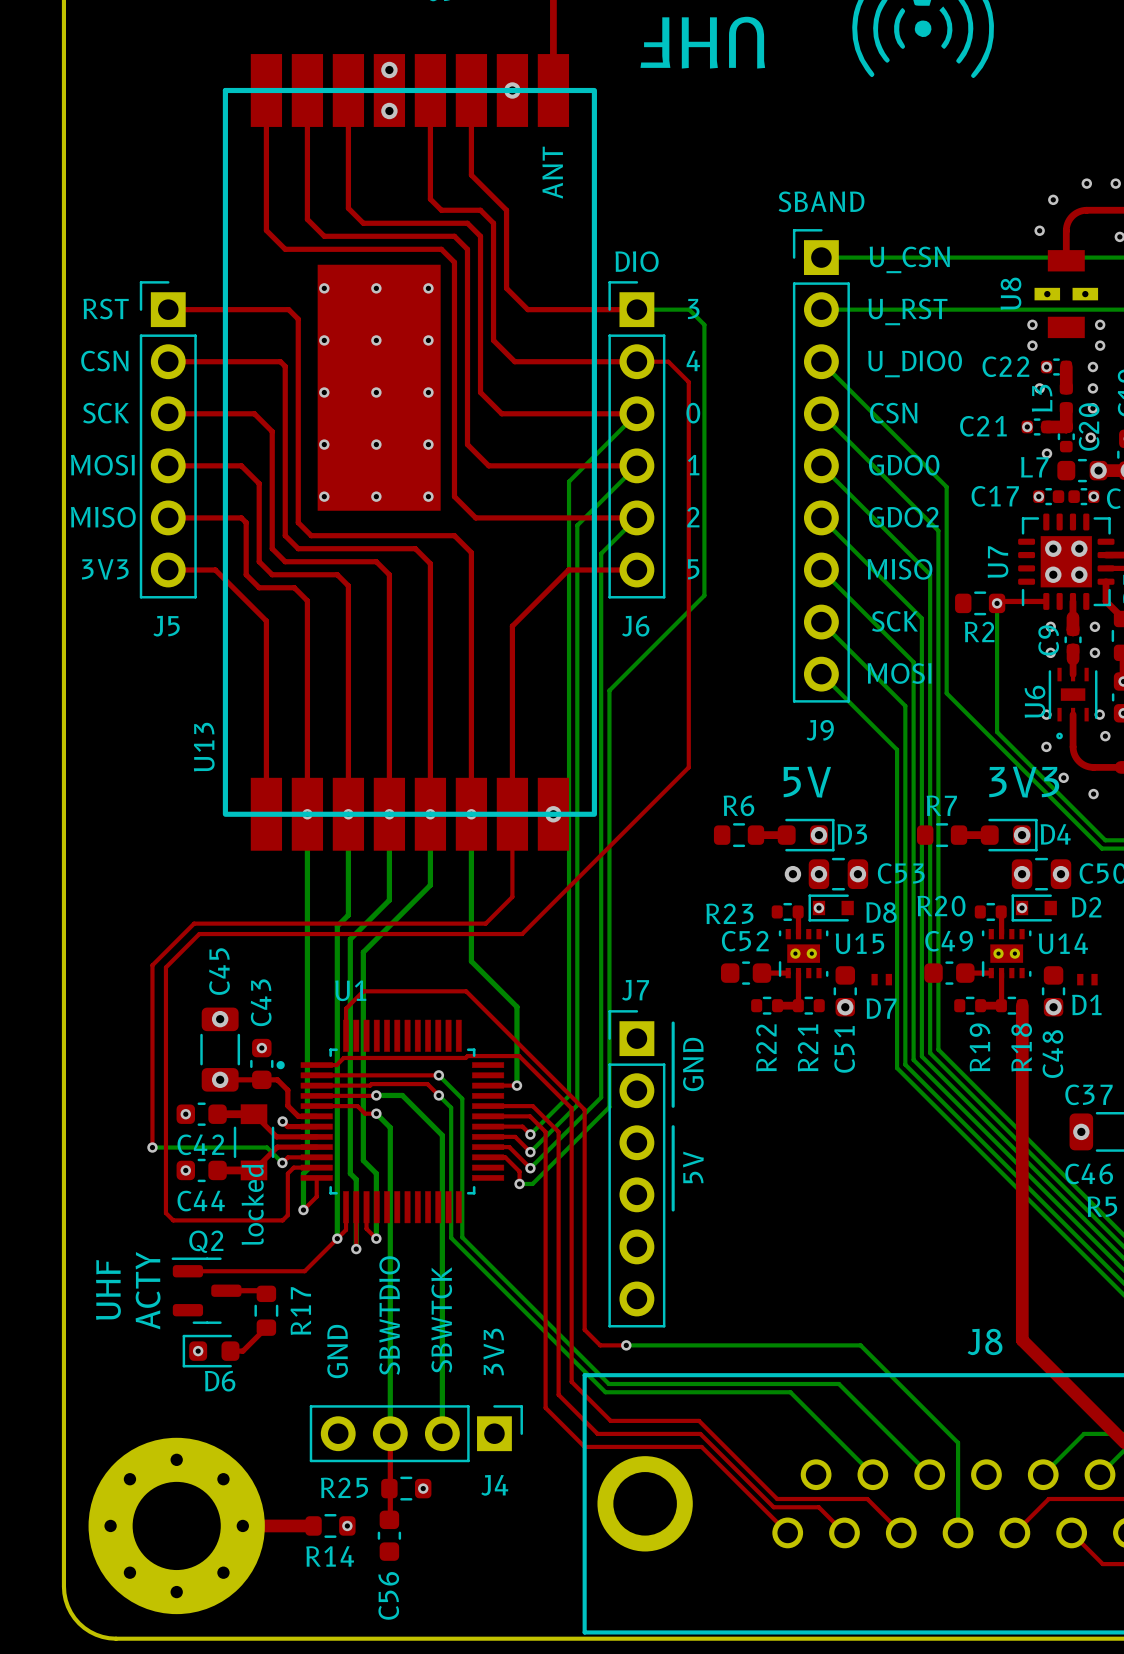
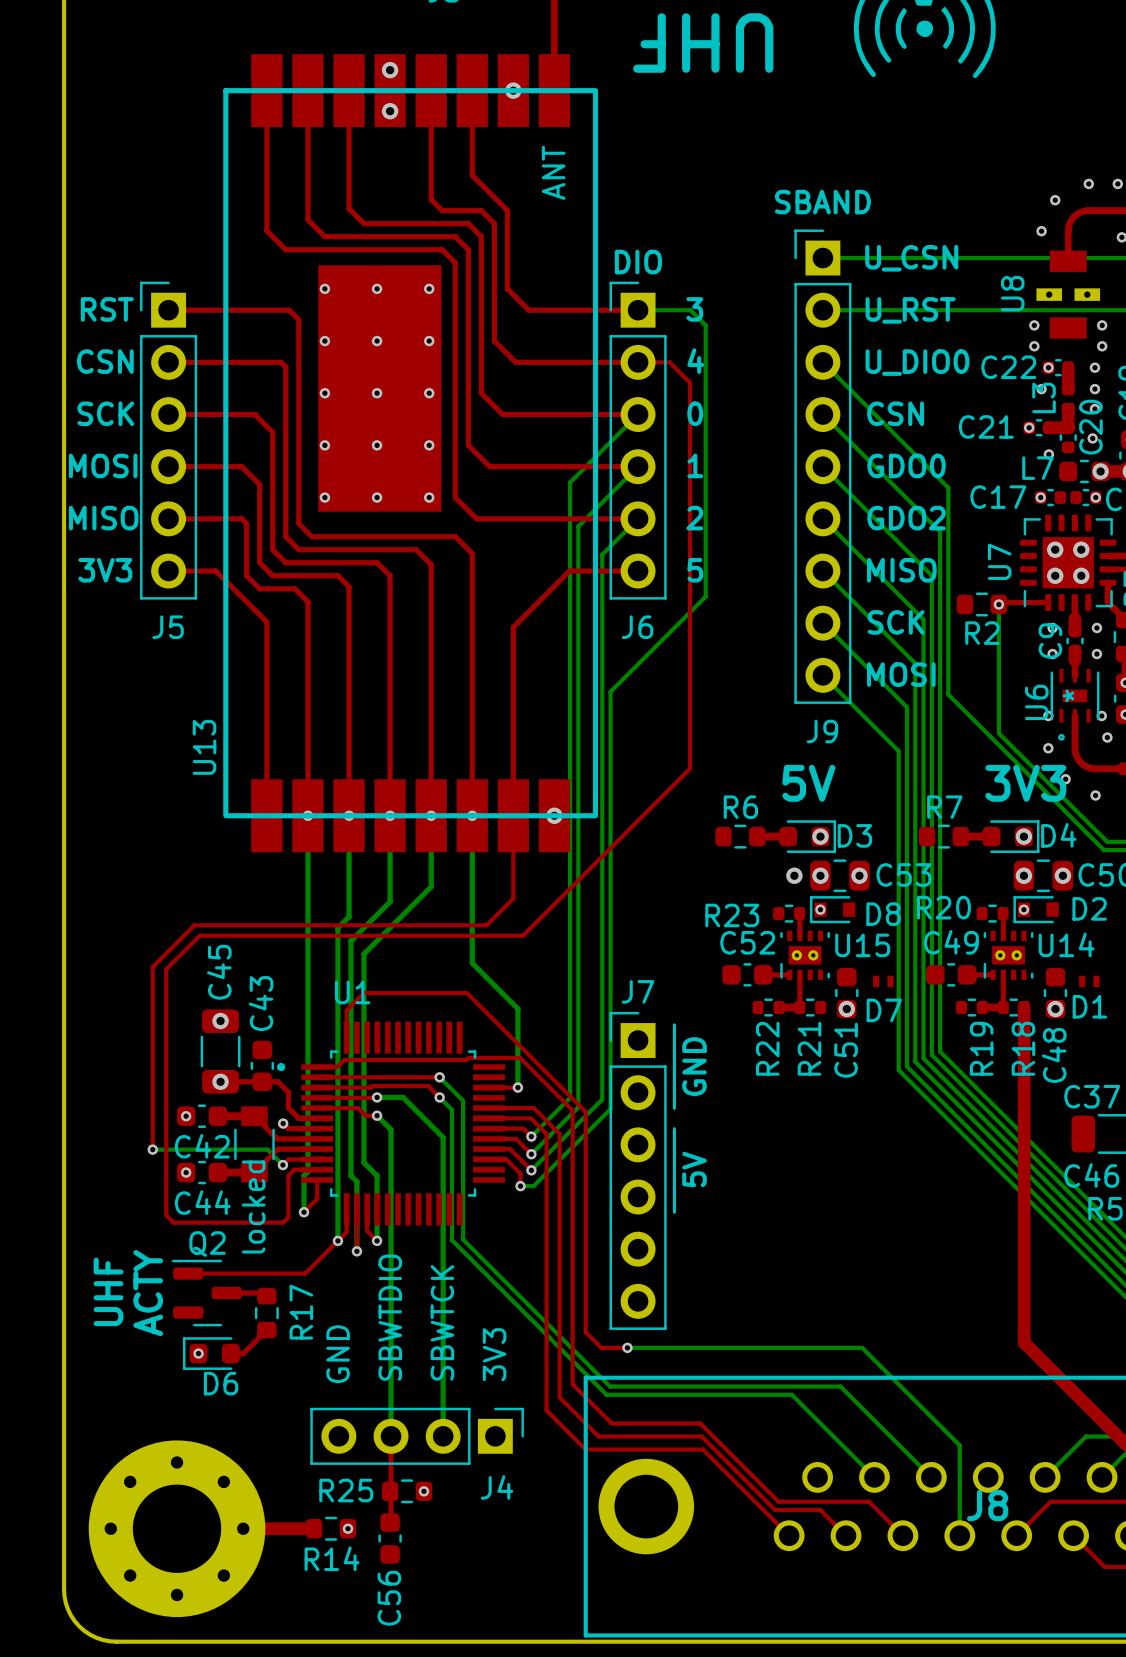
U6 text: none -> * (1068, 695)
via: (261, 1048) -> none
via: (1081, 1131) -> none
J8 name position: J8 (985, 1341) -> J8 (987, 1505)

